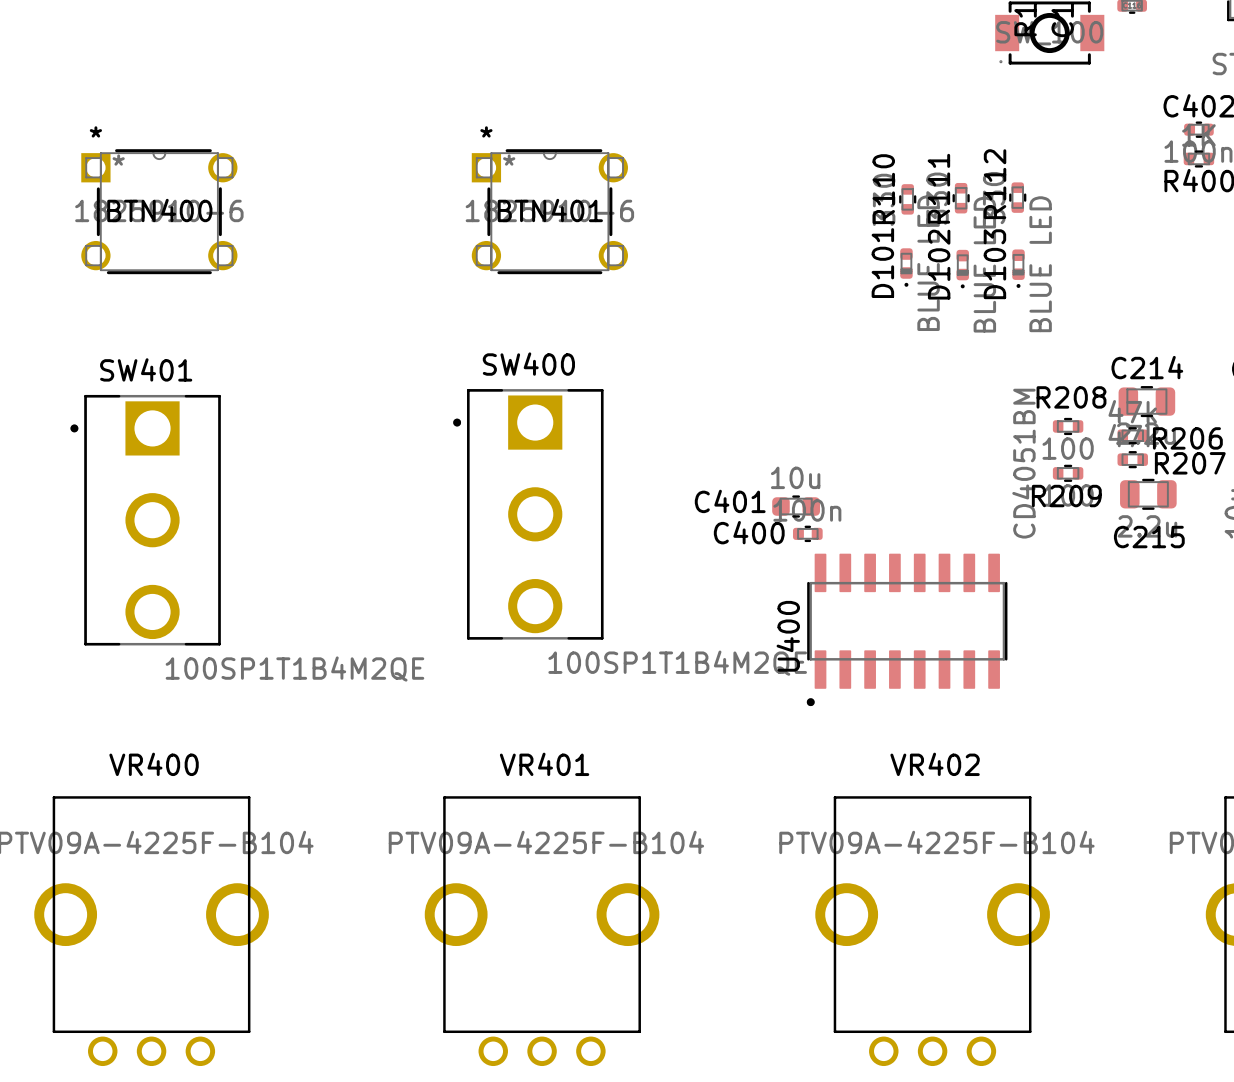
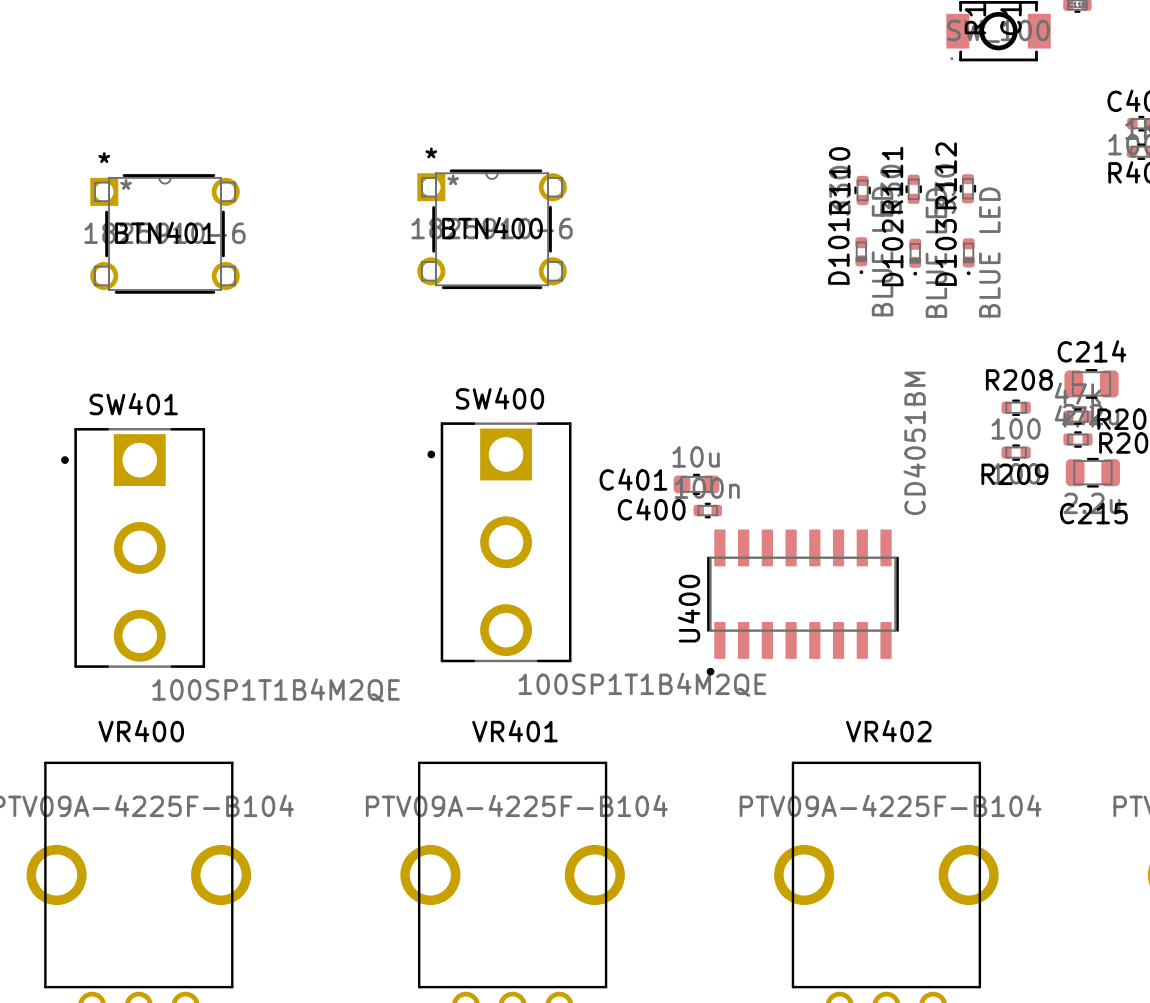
BTN400 position: (159, 211) -> (492, 229)
BTN401 position: (549, 211) -> (164, 233)
C401 position: (796, 506) -> (696, 484)
SW400 position: (528, 514) -> (499, 542)
SW401 position: (145, 520) -> (133, 547)
C400 position: (807, 533) -> (707, 510)
U400 position: (907, 629) -> (802, 602)

